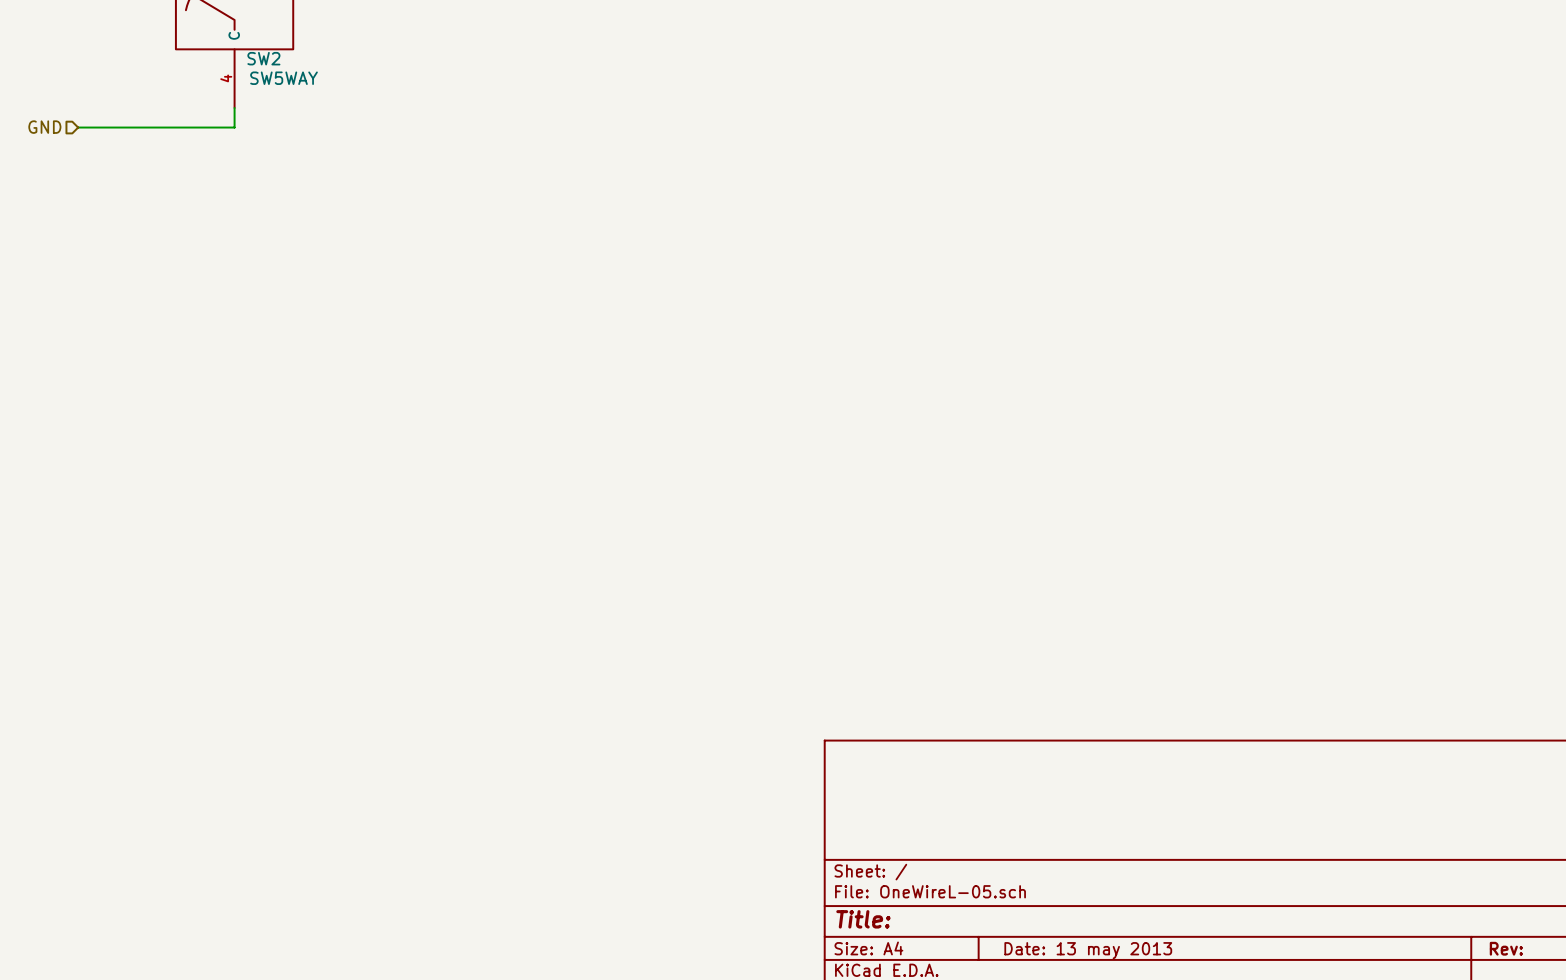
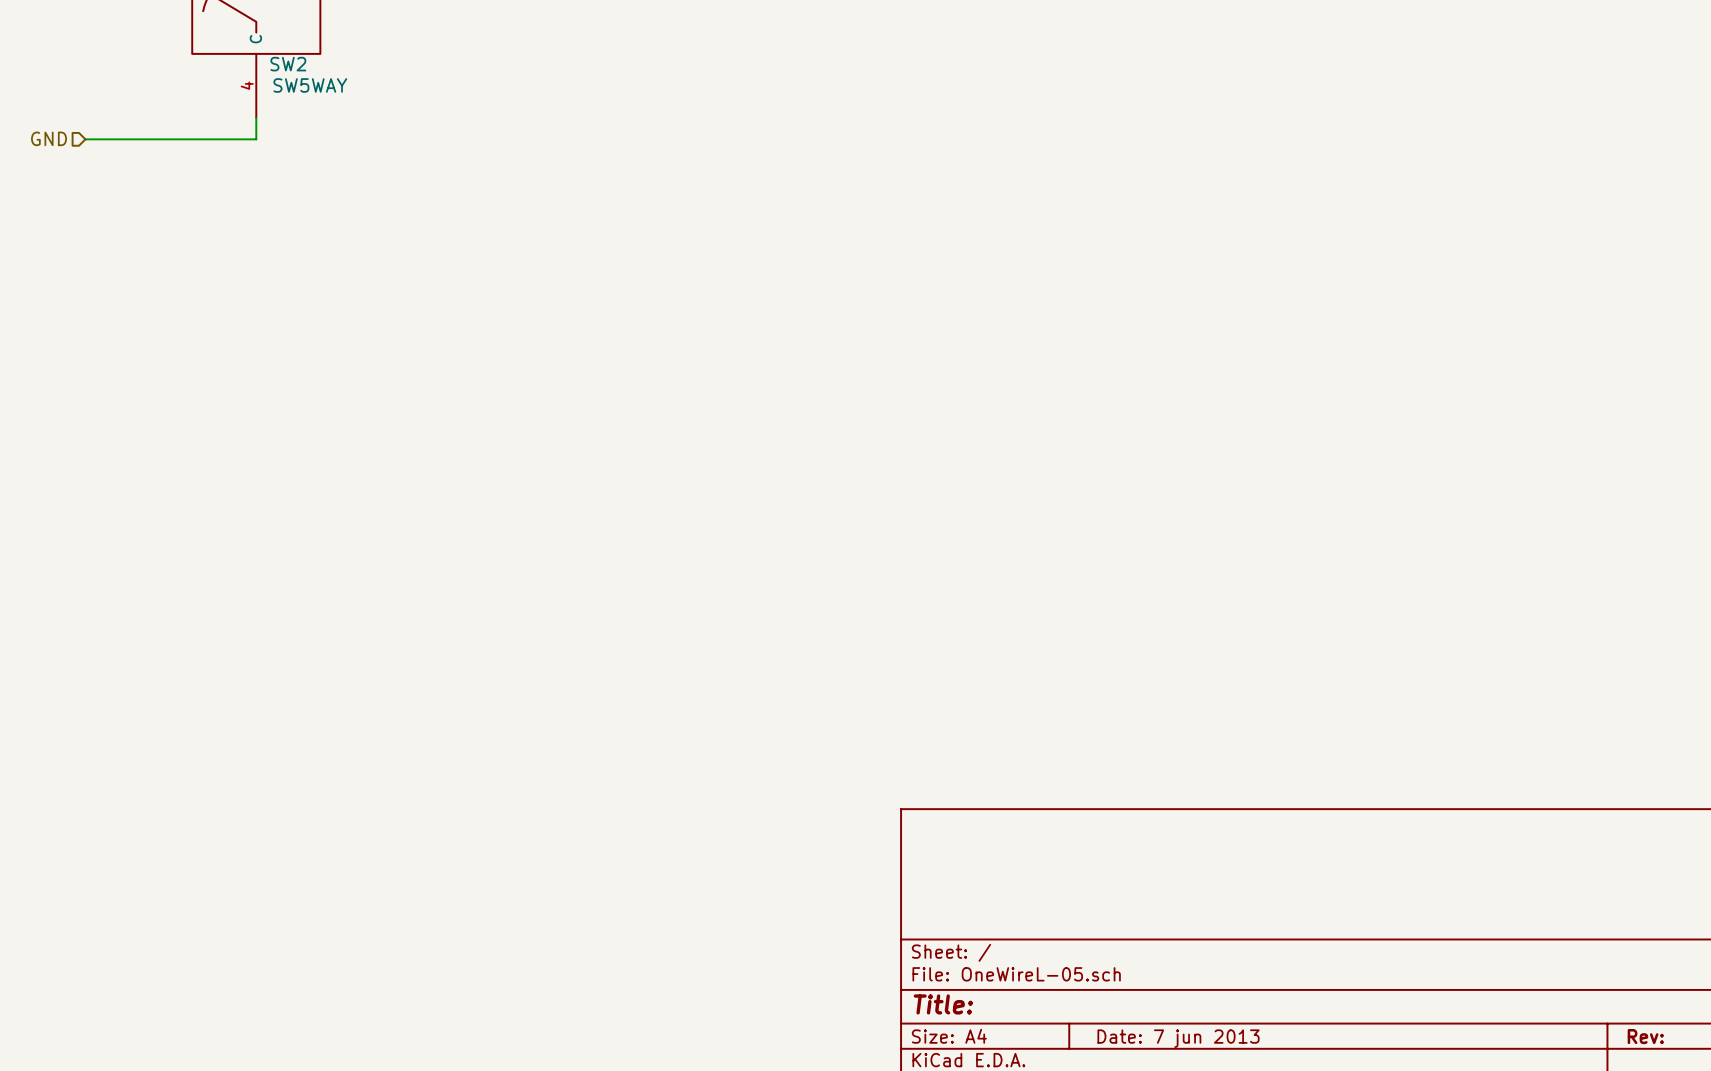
title block: Date: 13 may 2013 (1088, 950) -> Date: 7 jun 2013 (1178, 1038)

